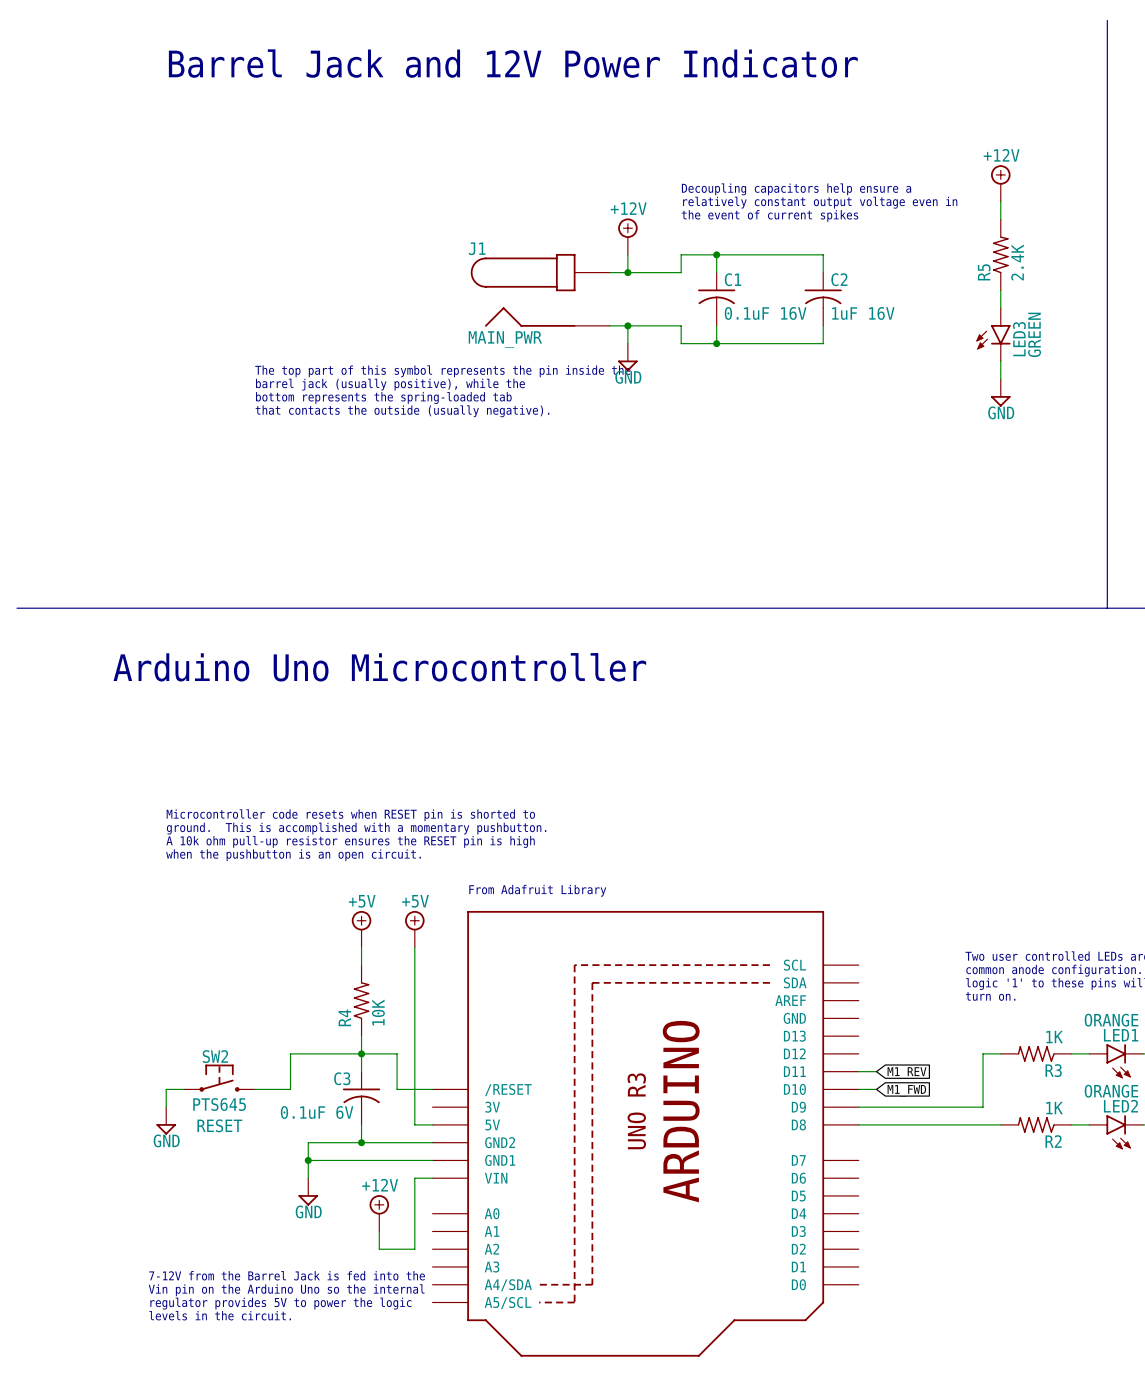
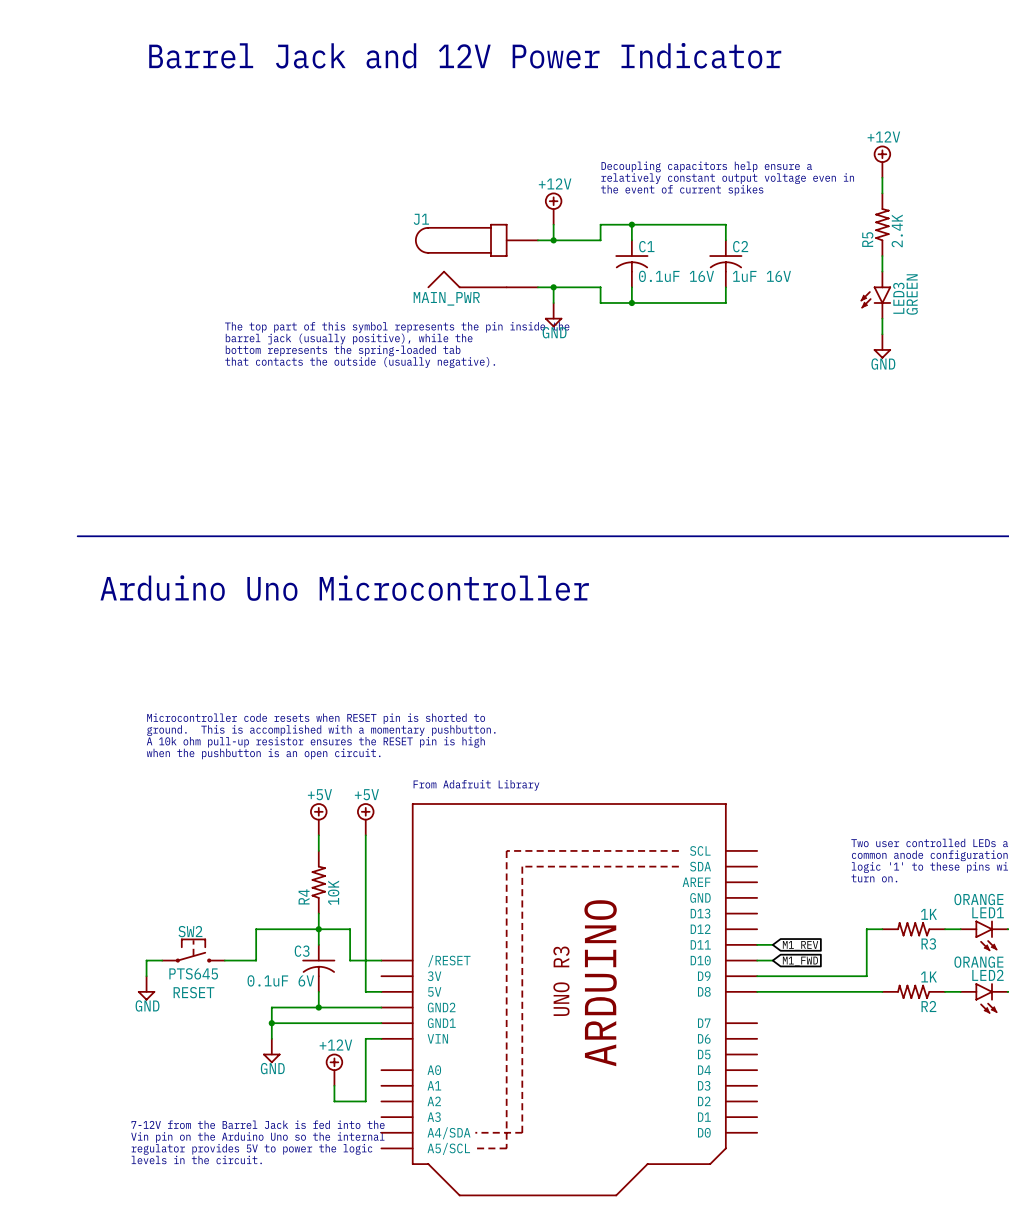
line: (1107, 20) (1107, 608) -> none
line: (17, 608) (88, 608) -> none

